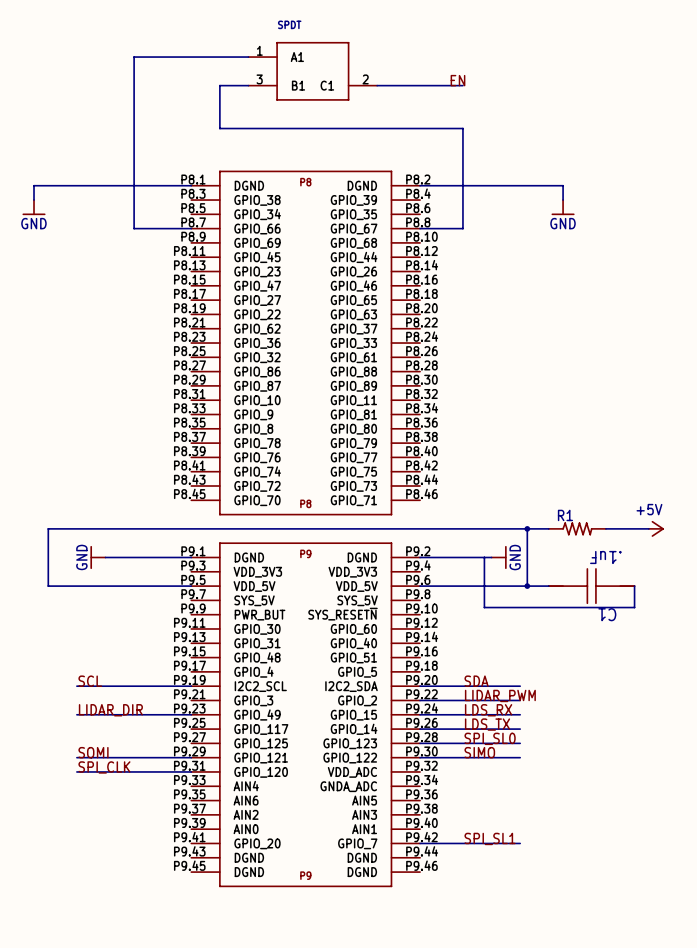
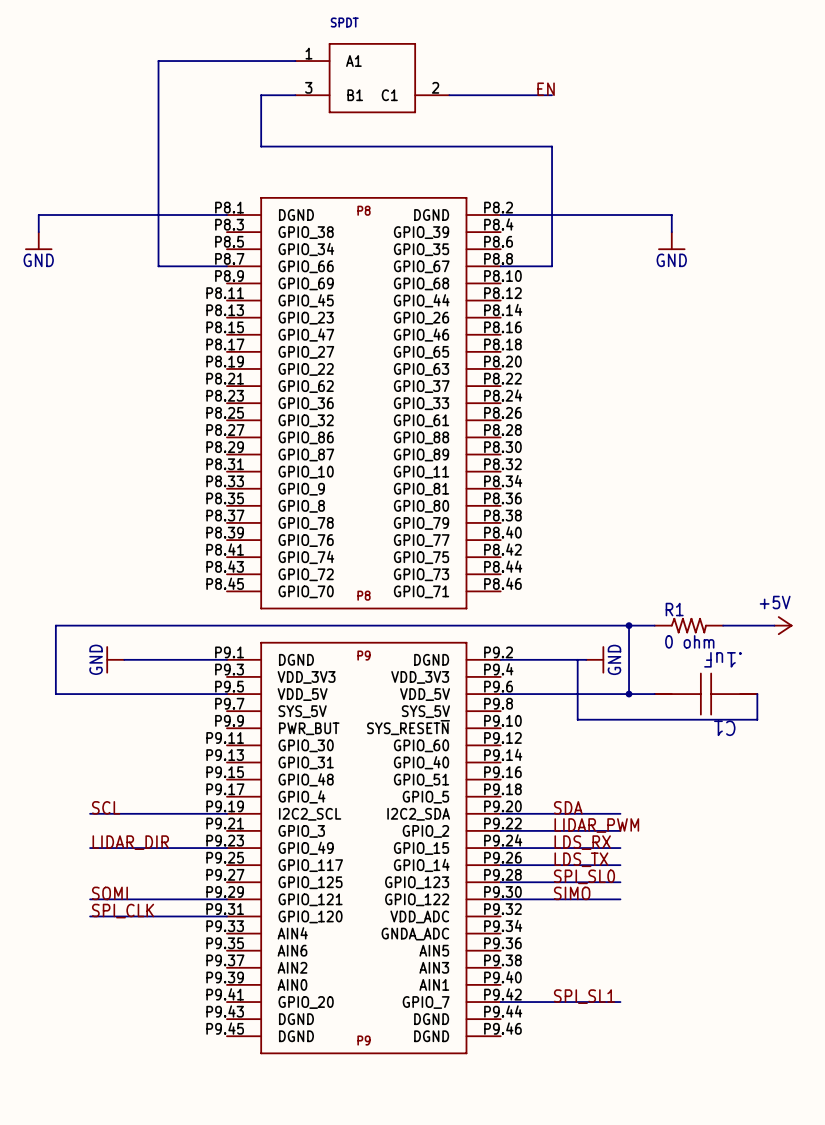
R1 value: none -> 0 ohm (689, 641)

